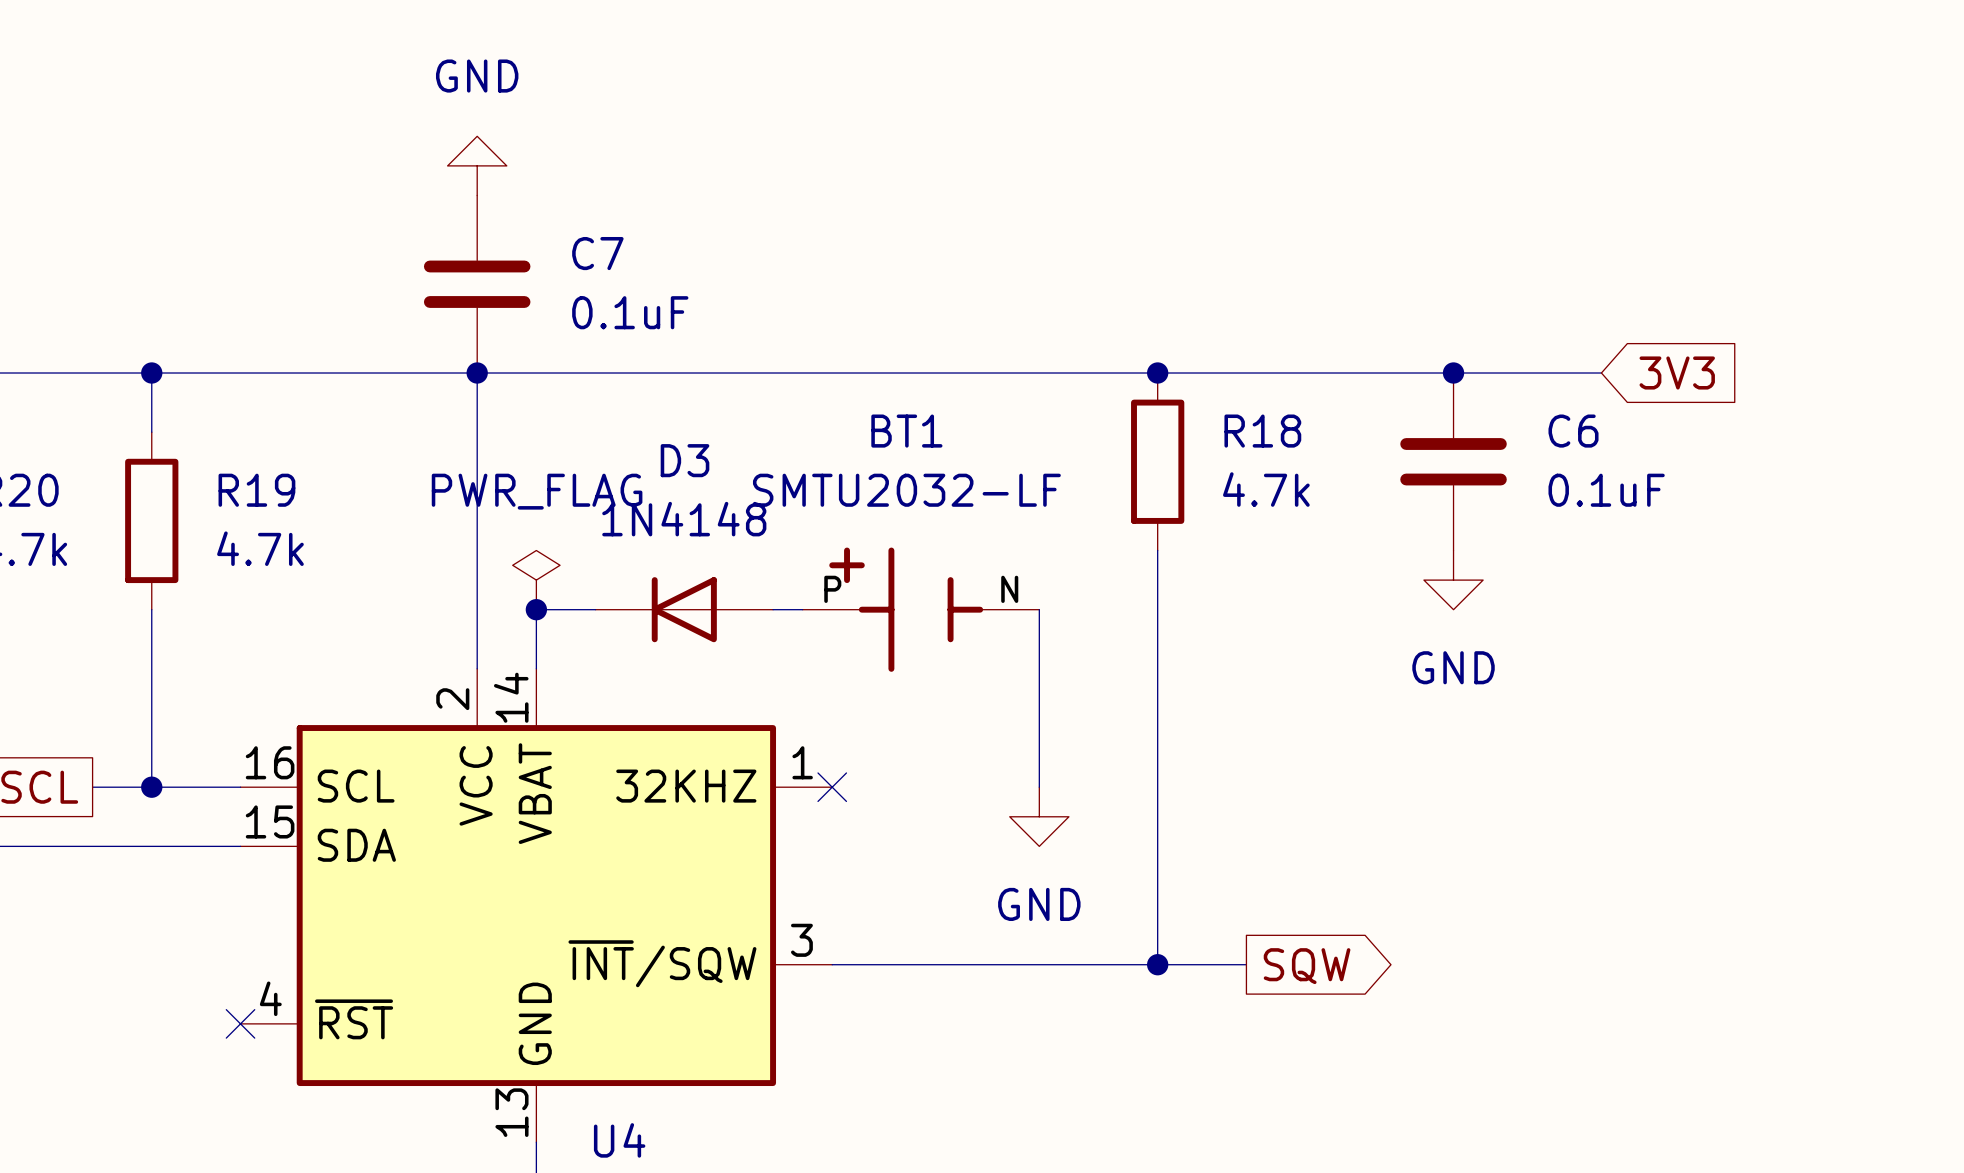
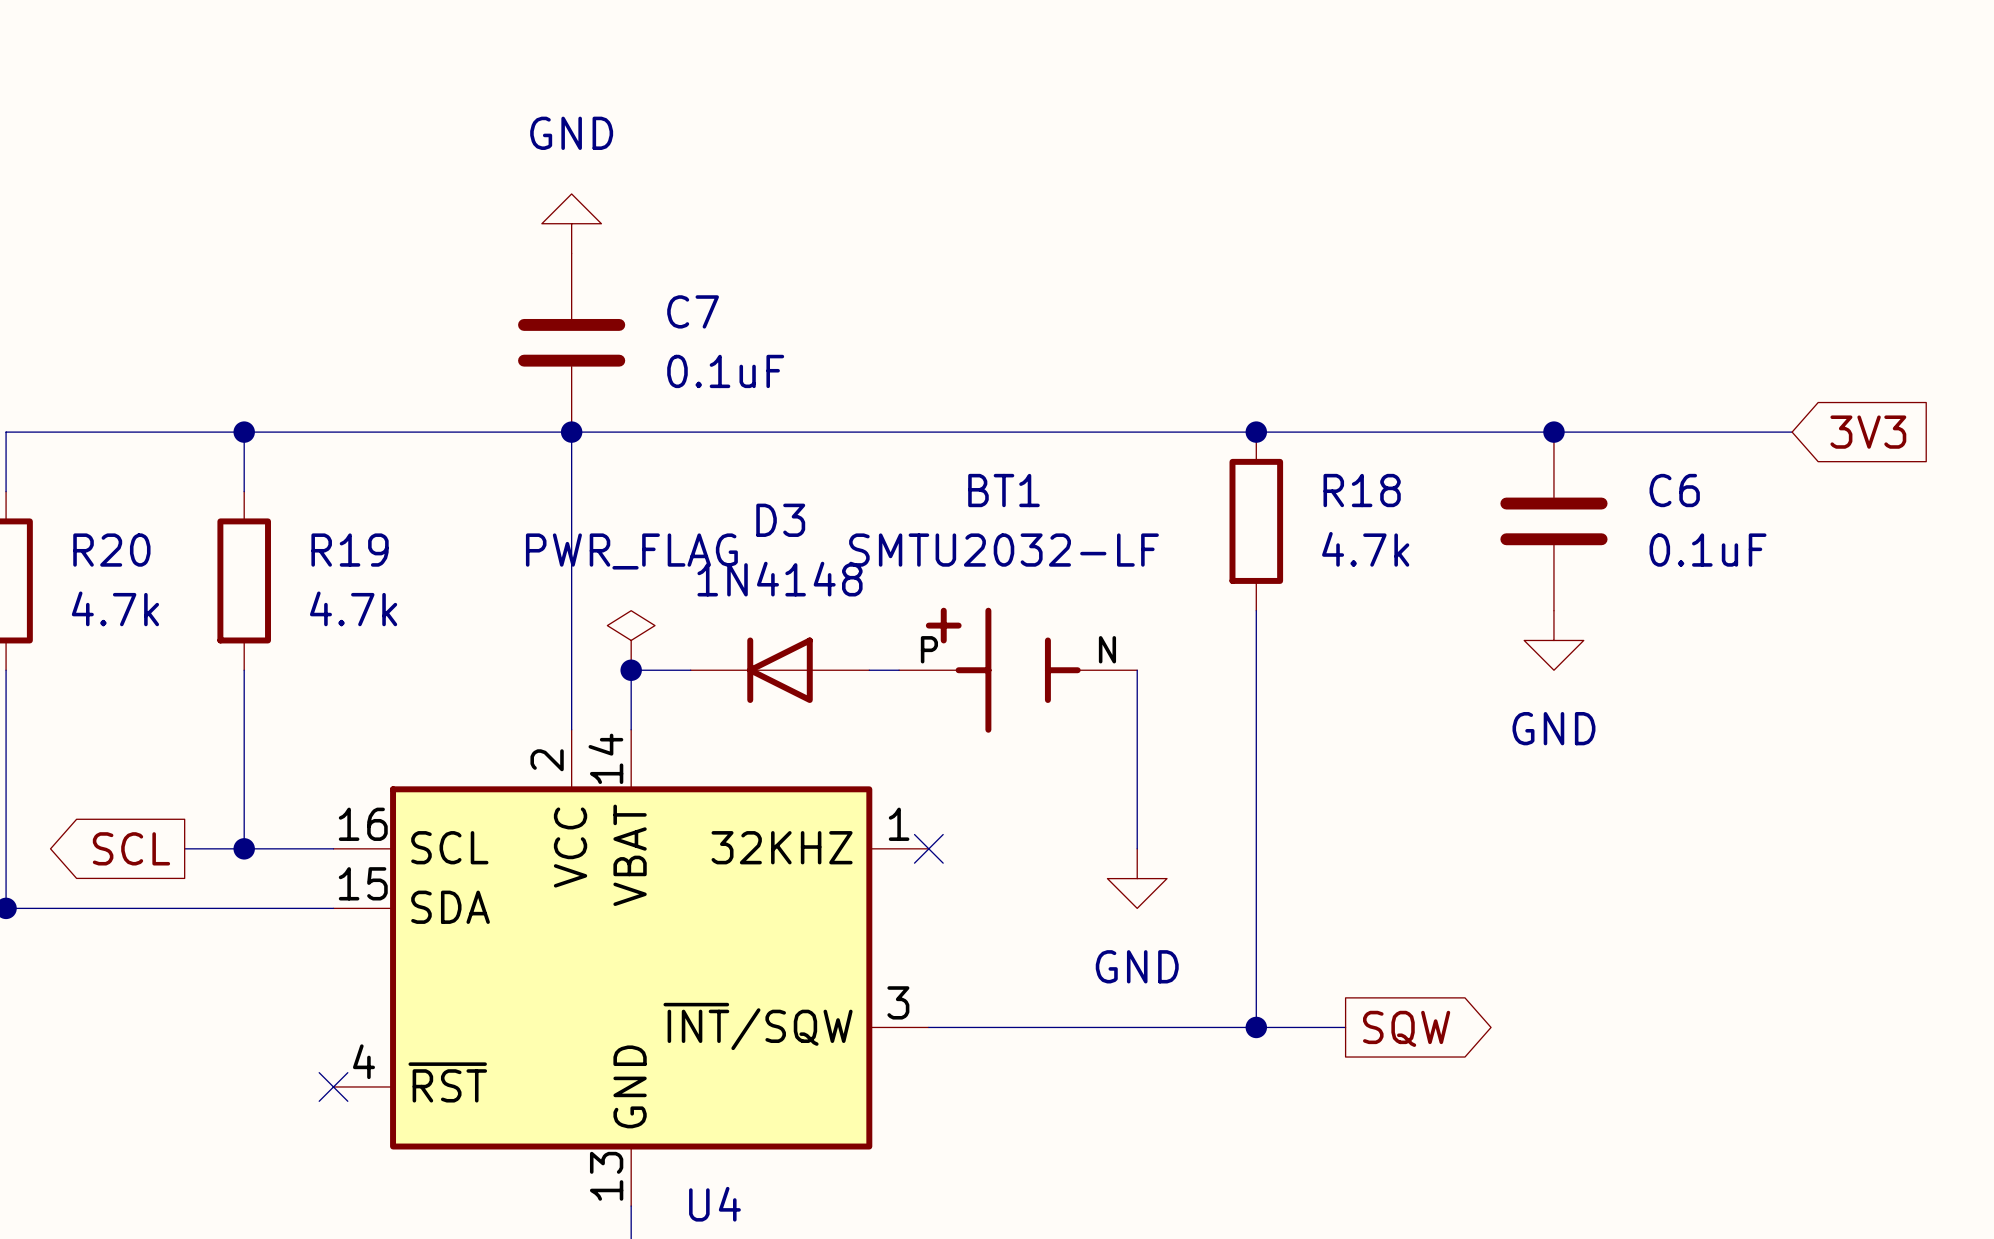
wire: none -> (1702, 432) (1792, 432)
global label position: 3V3 (1677, 373) -> 3V3 (1868, 432)

